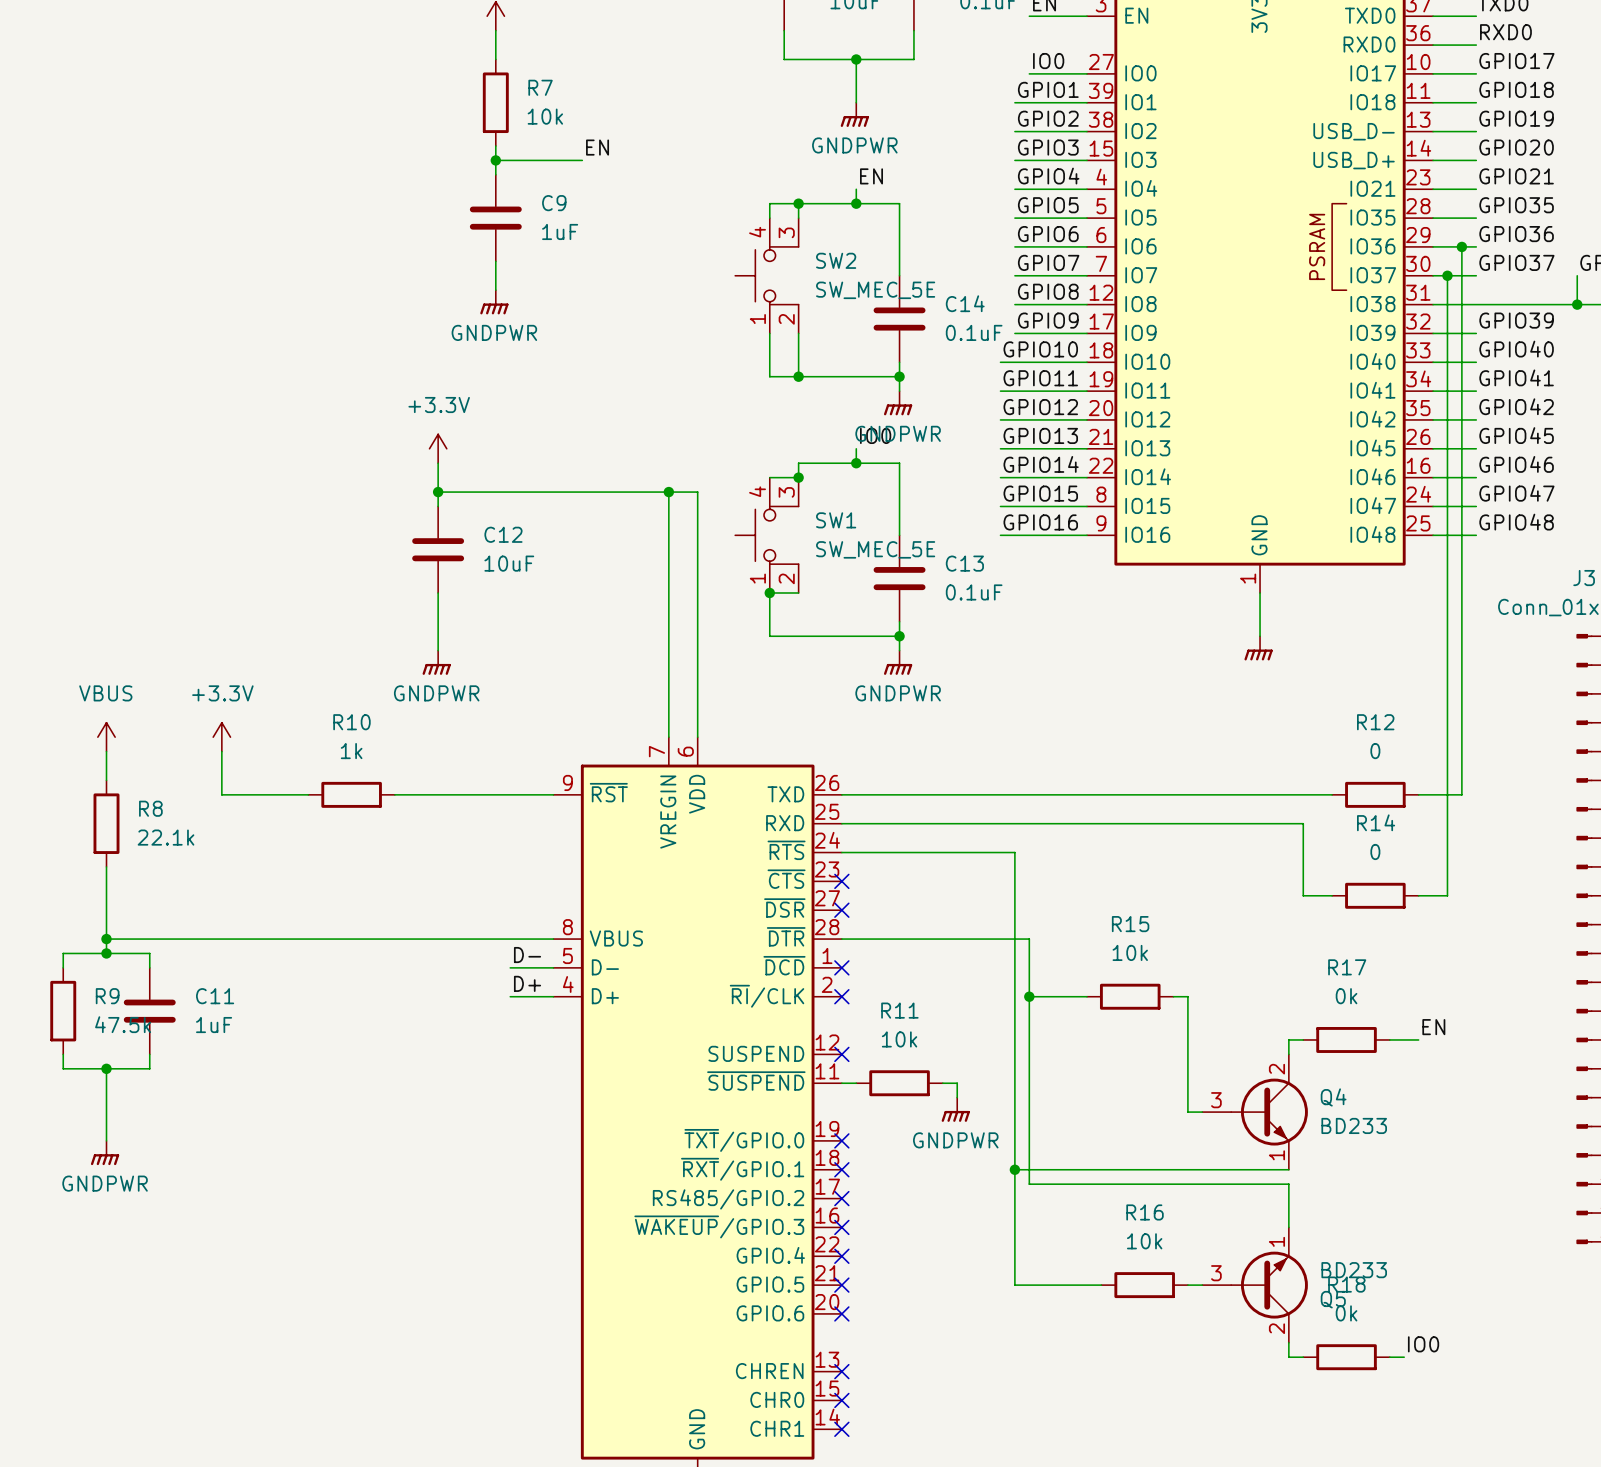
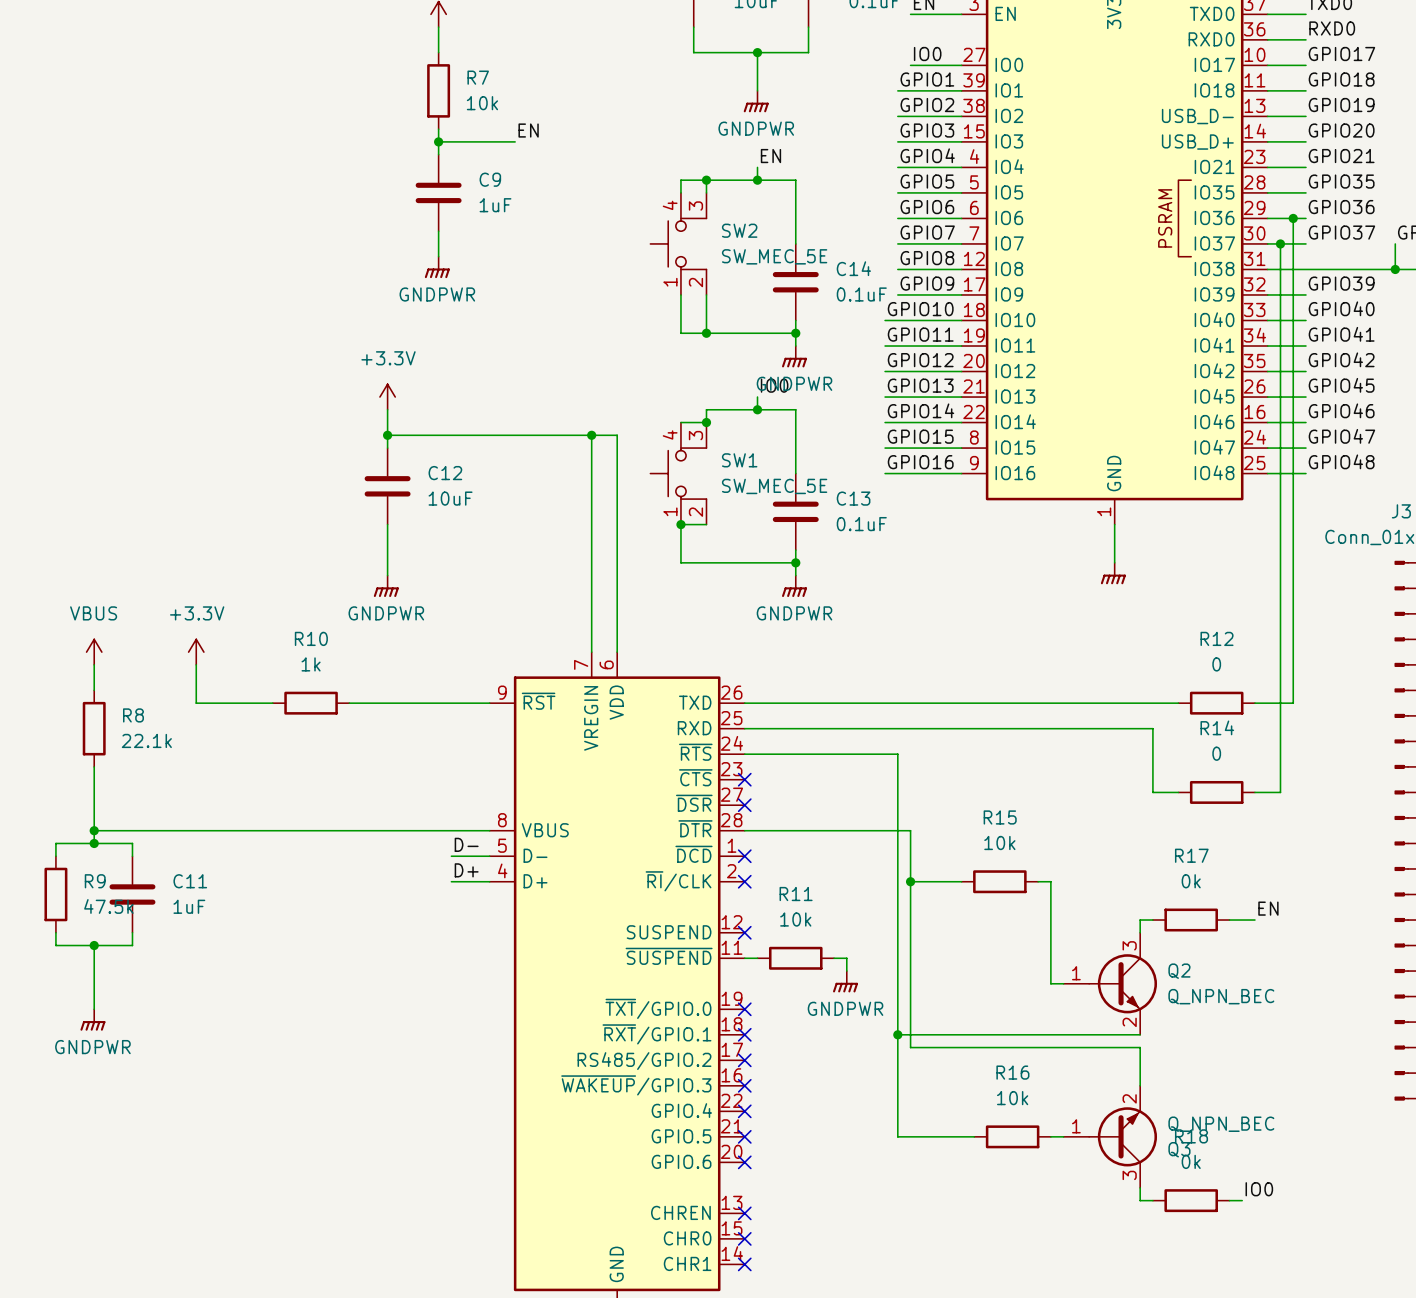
Q4 pin number: 2 (1276, 1069) -> 3 (1129, 945)
Q4 name: Q4 (1333, 1097) -> Q2 (1179, 971)
Q4 pin number: 3 (1216, 1100) -> 1 (1076, 973)
Q4 value: BD233 (1354, 1125) -> Q_NPN_BEC (1221, 996)
Q4 pin number: 1 (1276, 1155) -> 2 (1129, 1022)
Q5 pin number: 1 (1276, 1241) -> 2 (1129, 1098)
Q5 value: BD233 (1354, 1270) -> Q_NPN_BEC (1221, 1124)
Q5 pin number: 3 (1216, 1273) -> 1 (1076, 1126)
Q5 name: Q5 (1333, 1299) -> Q3 (1179, 1149)
Q5 pin number: 2 (1276, 1328) -> 3 (1129, 1175)

